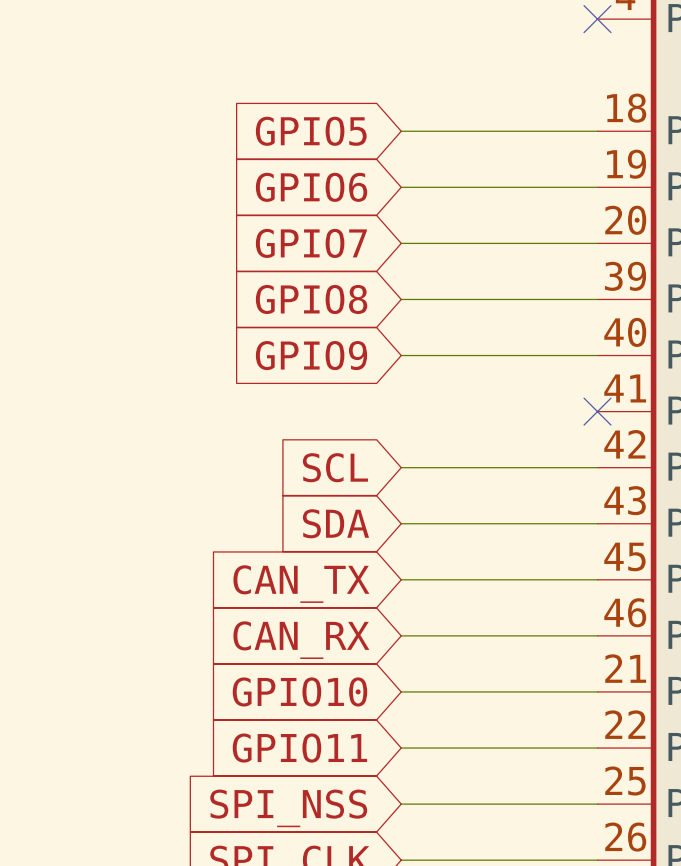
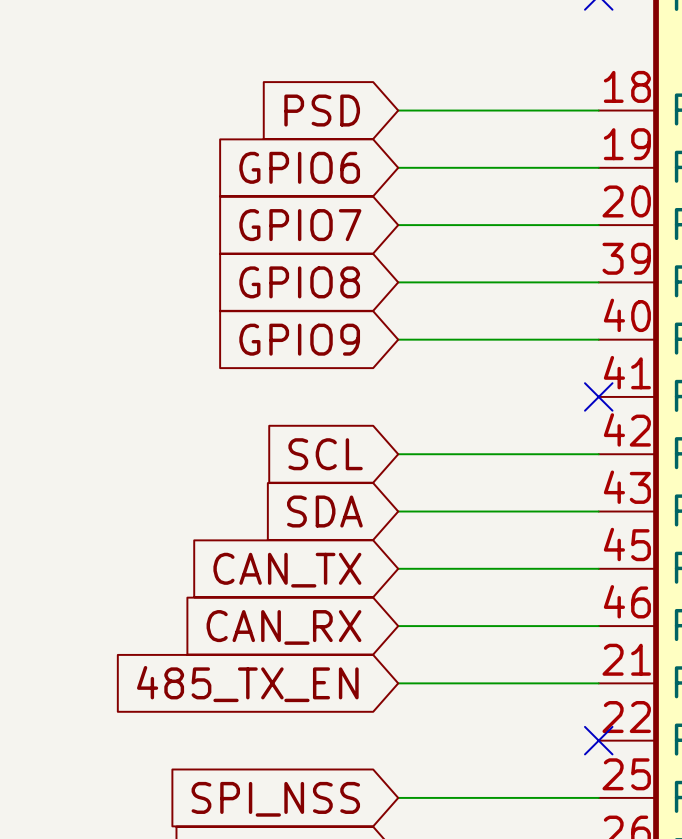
global label: GPIO5 (311, 131) -> PSD (322, 110)
global label: GPIO10 (299, 691) -> 485_TX_EN (247, 684)
global label: GPIO11 (299, 748) -> none
wire: (401, 748) (597, 748) -> none
no-connect mark: none -> (598, 740)

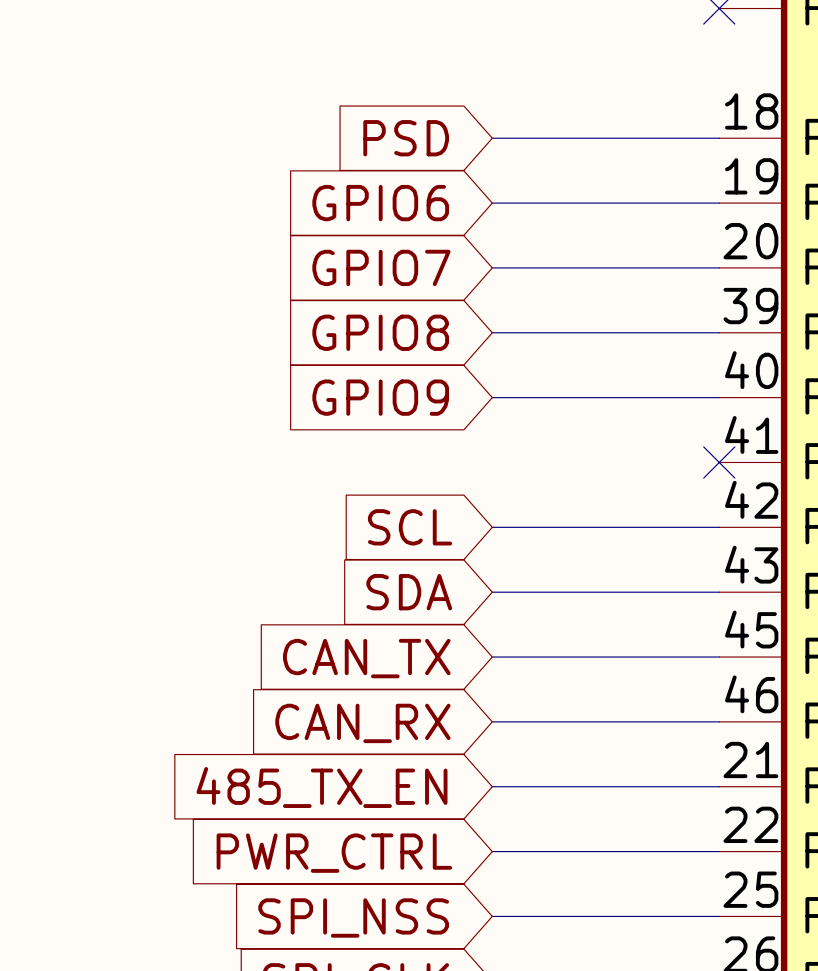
wire: none -> (492, 851) (719, 851)
no-connect mark: (598, 740) -> none
global label: none -> PWR_CTRL (334, 853)

